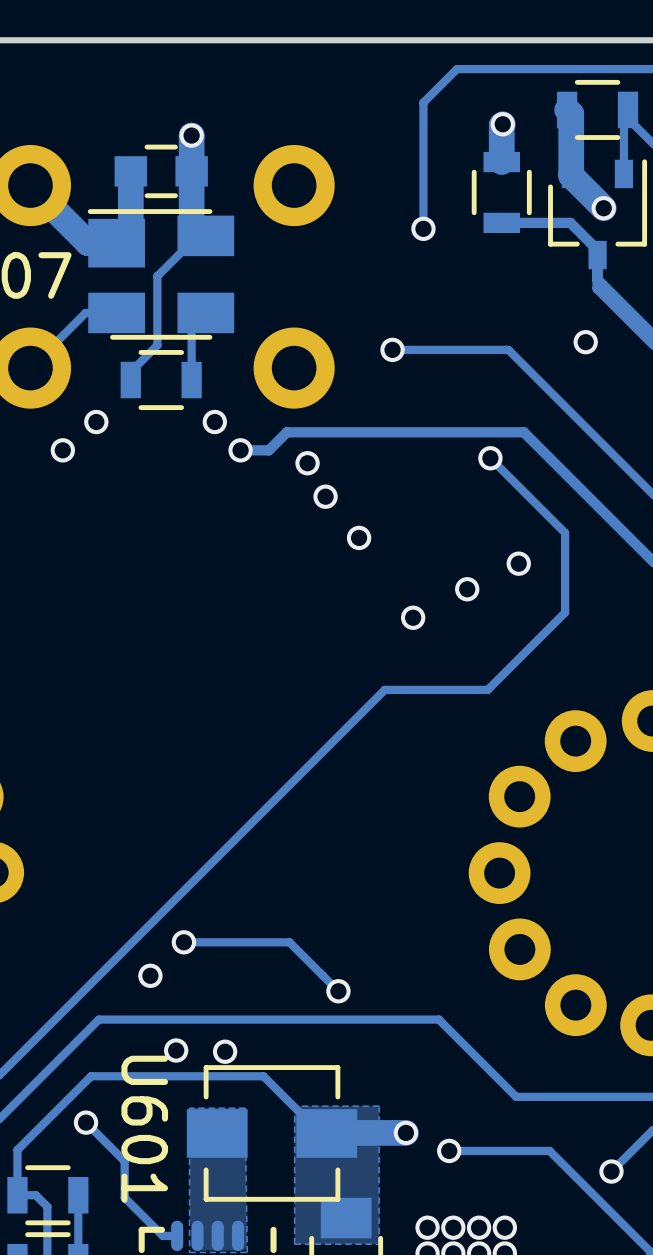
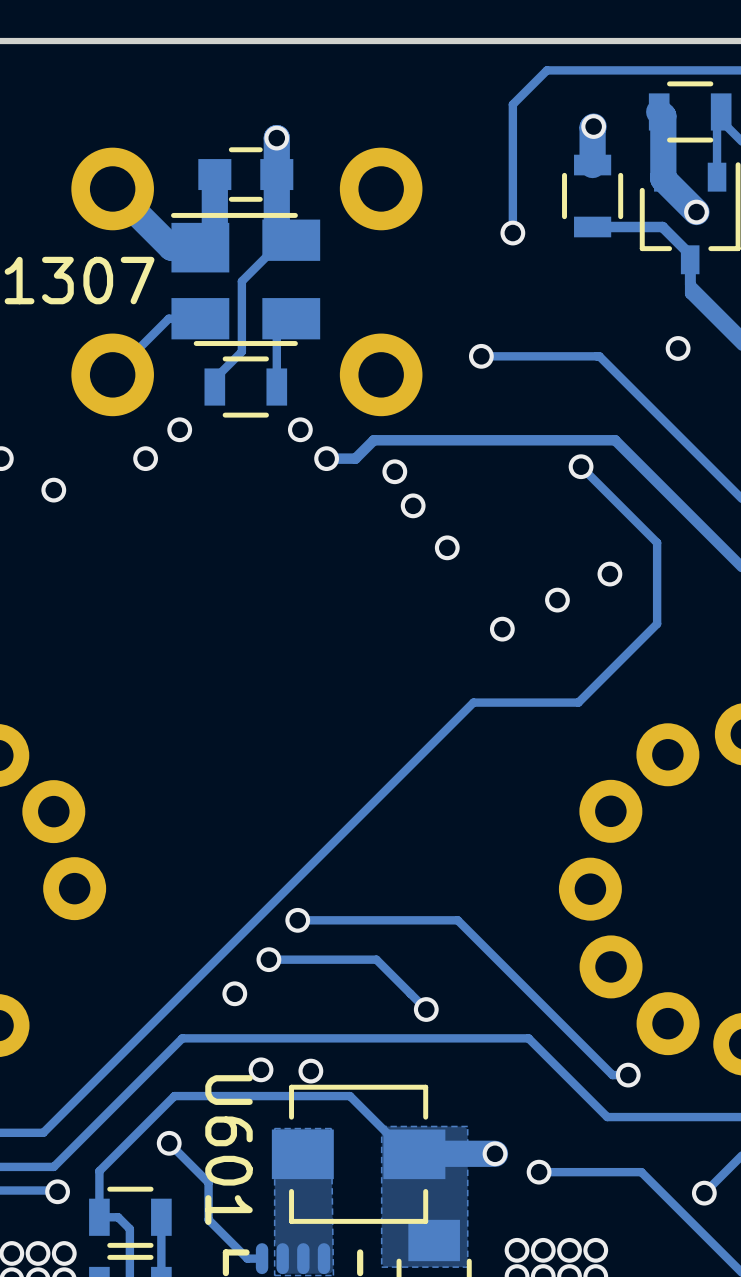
track: none -> (297, 920) (457, 920) (612, 1075) (628, 1075)
via: none -> (297, 920)
via: none -> (628, 1075)

